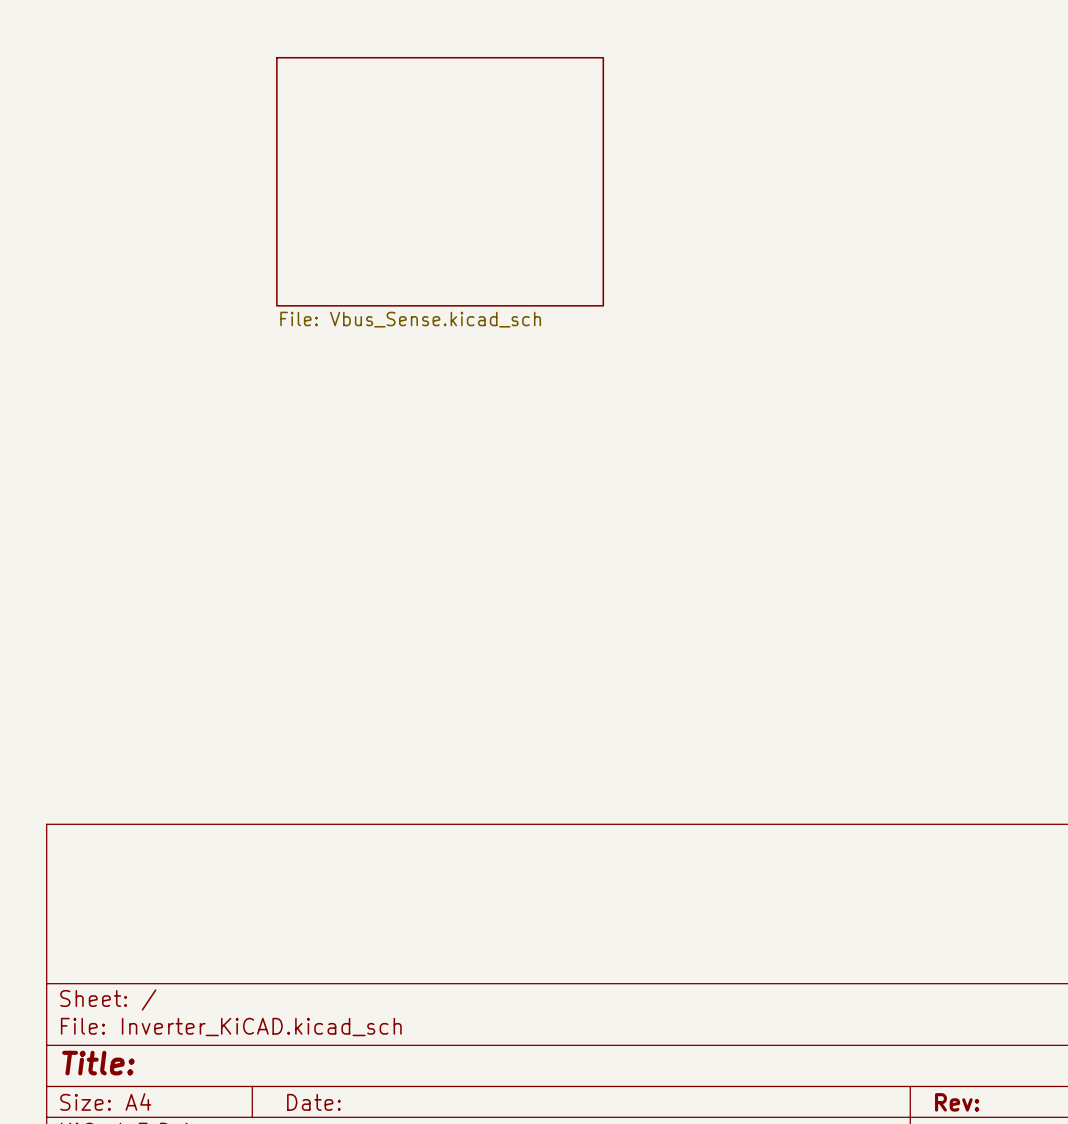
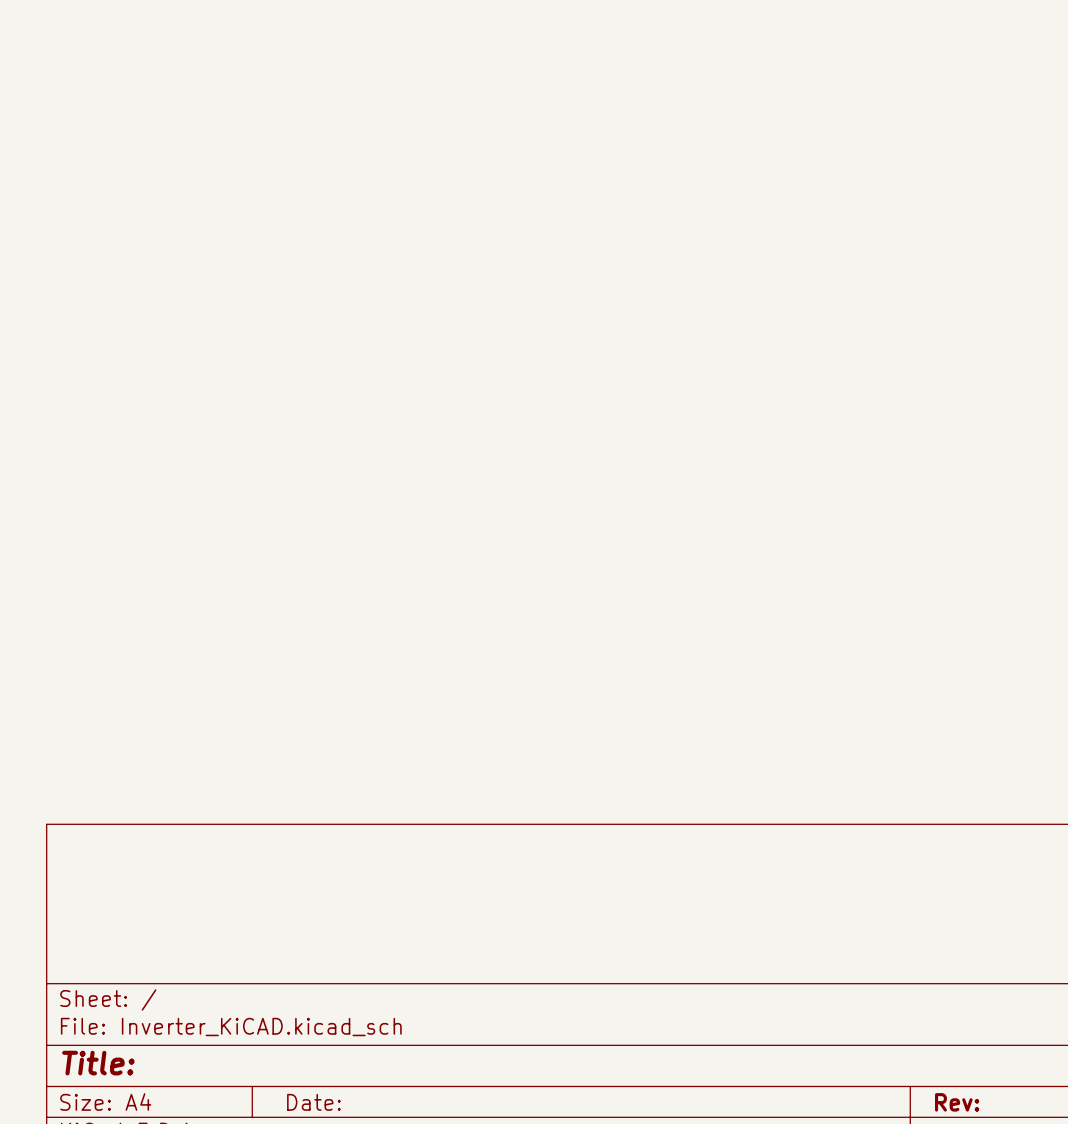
sheet: File: Vbus_Sense.kicad_sch (440, 181) -> none

